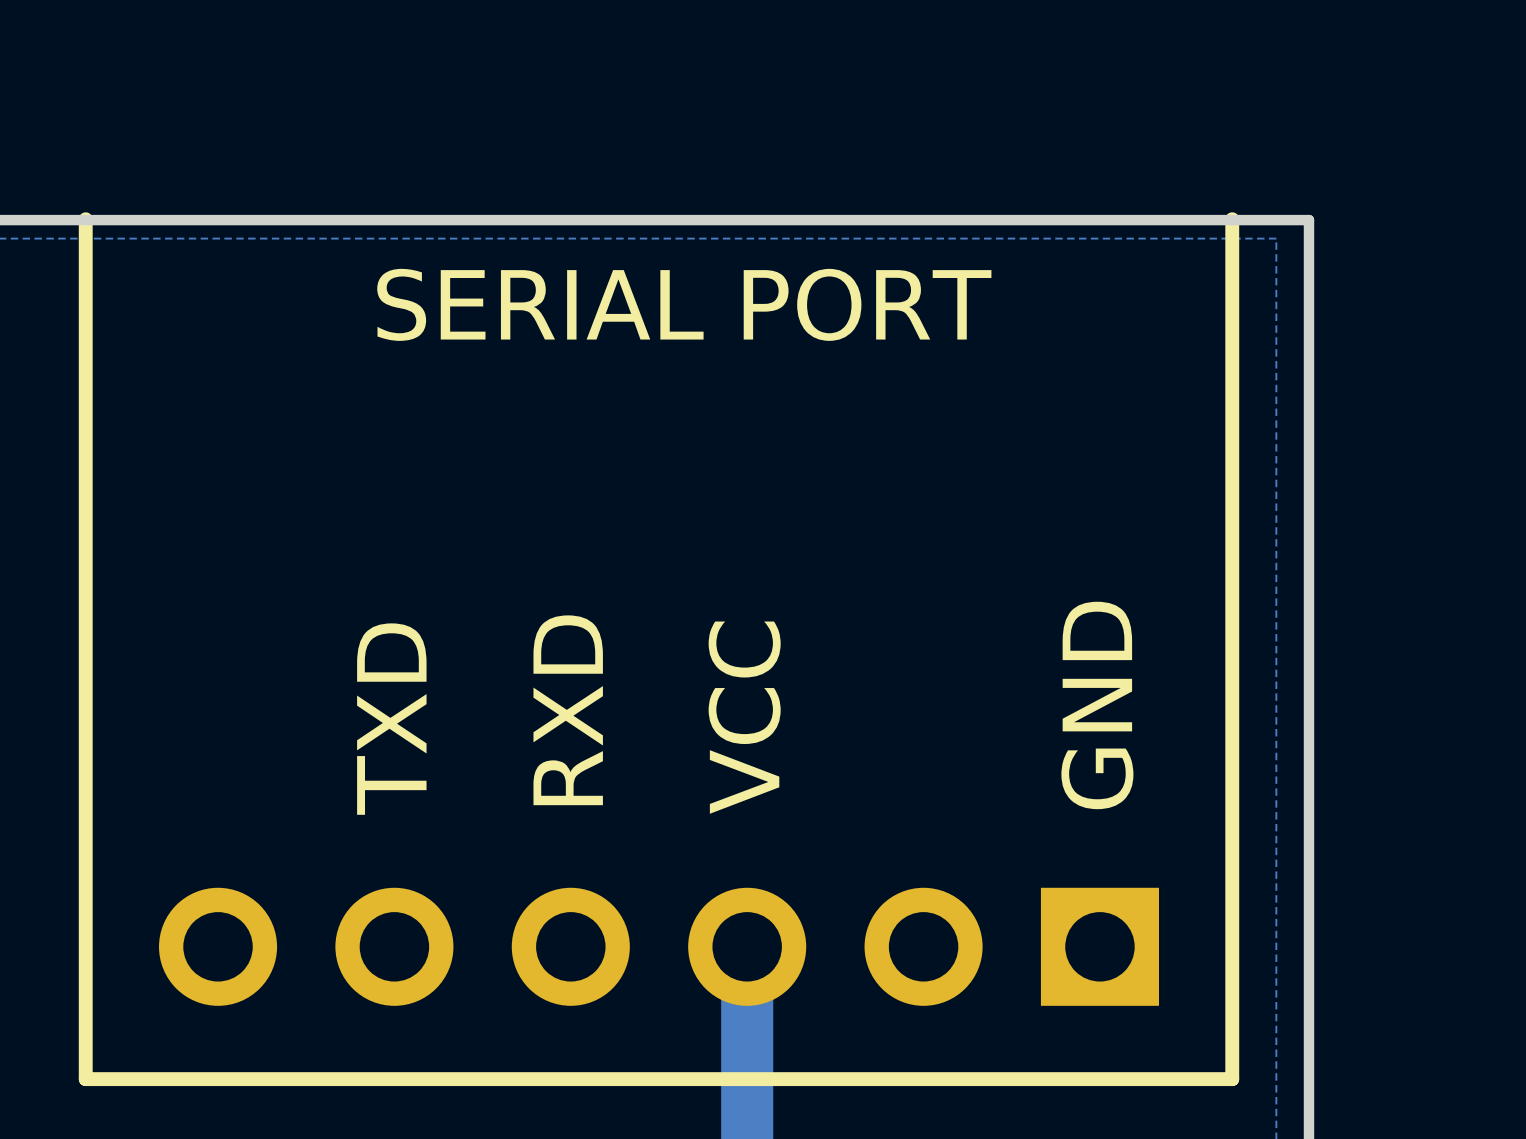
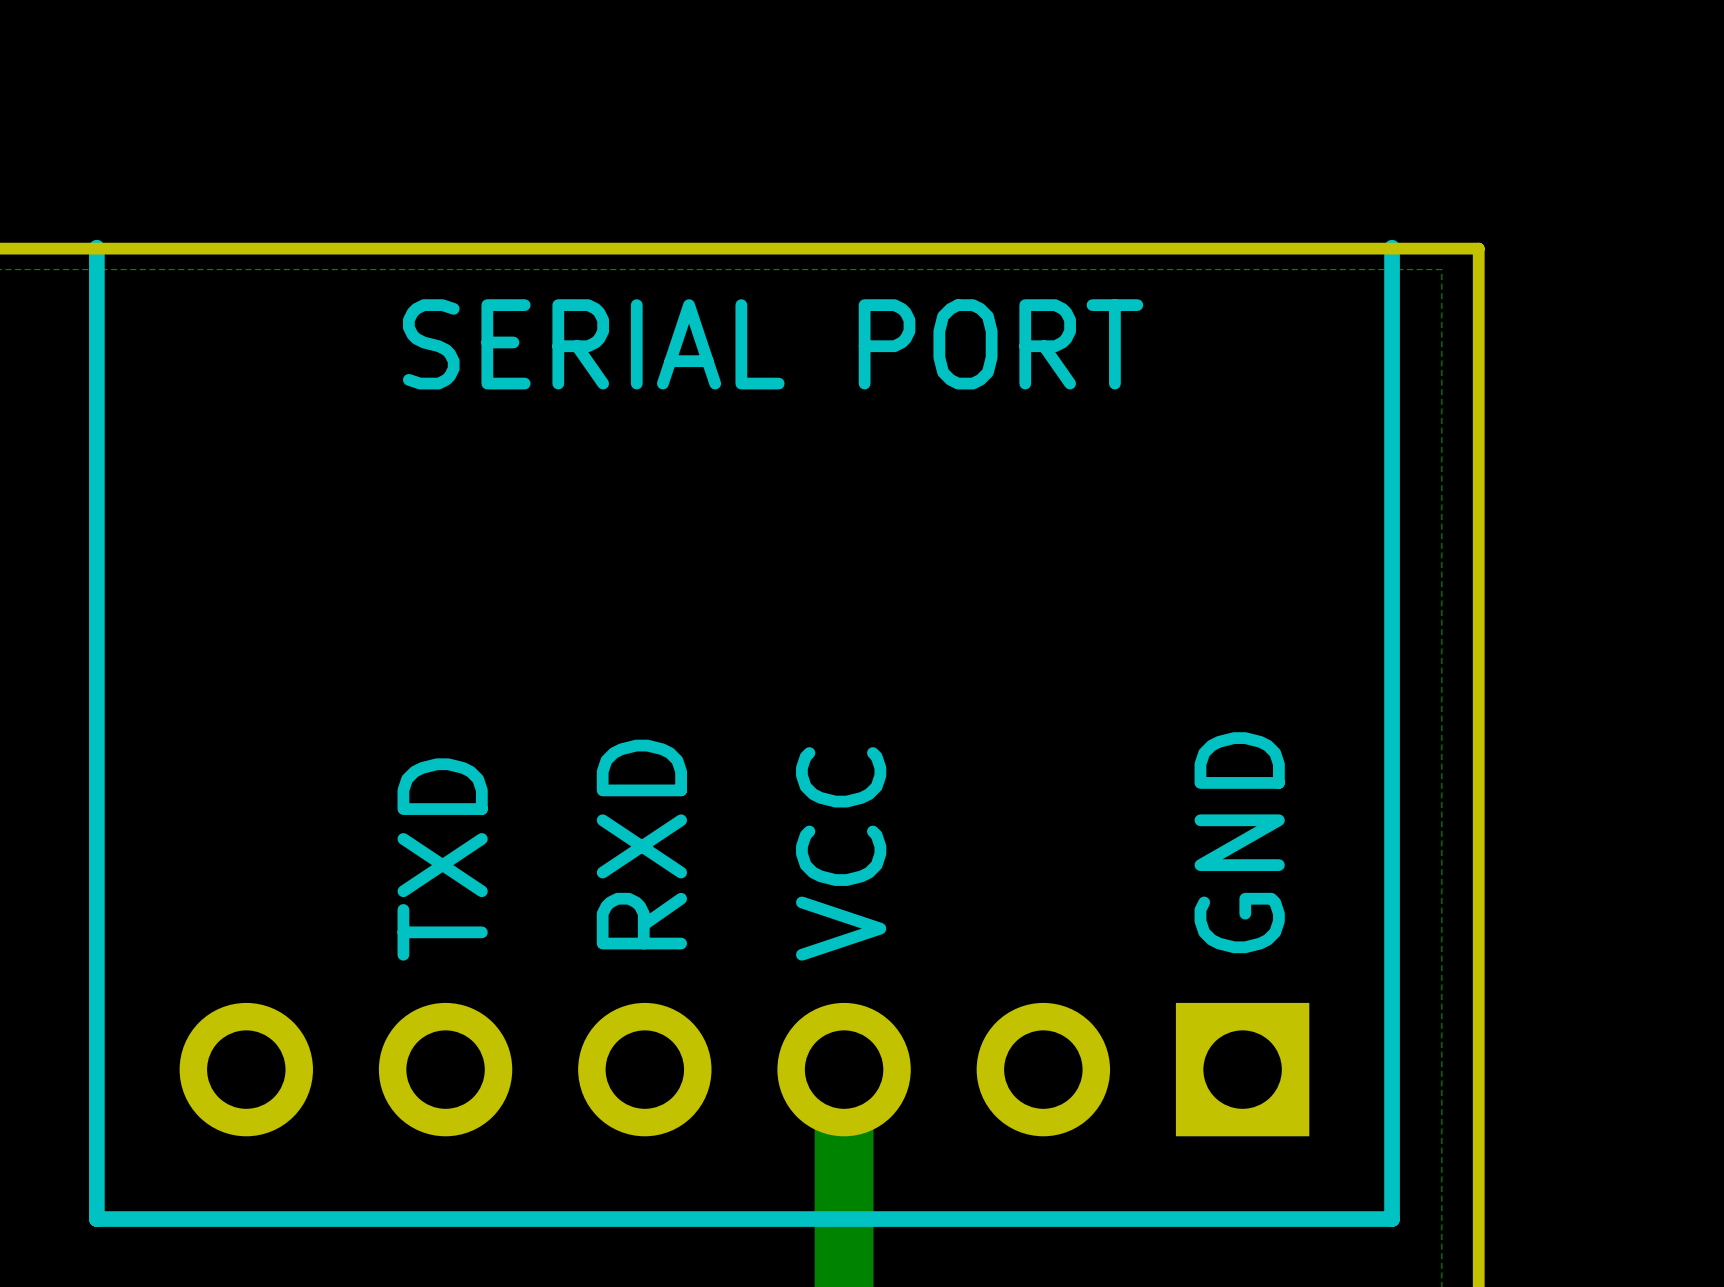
text position: GND (1097, 705) -> GND (1239, 842)
text position: RXD (568, 710) -> RXD (641, 844)
text position: VCC (744, 717) -> VCC (841, 853)
text position: TXD (391, 719) -> TXD (442, 859)

